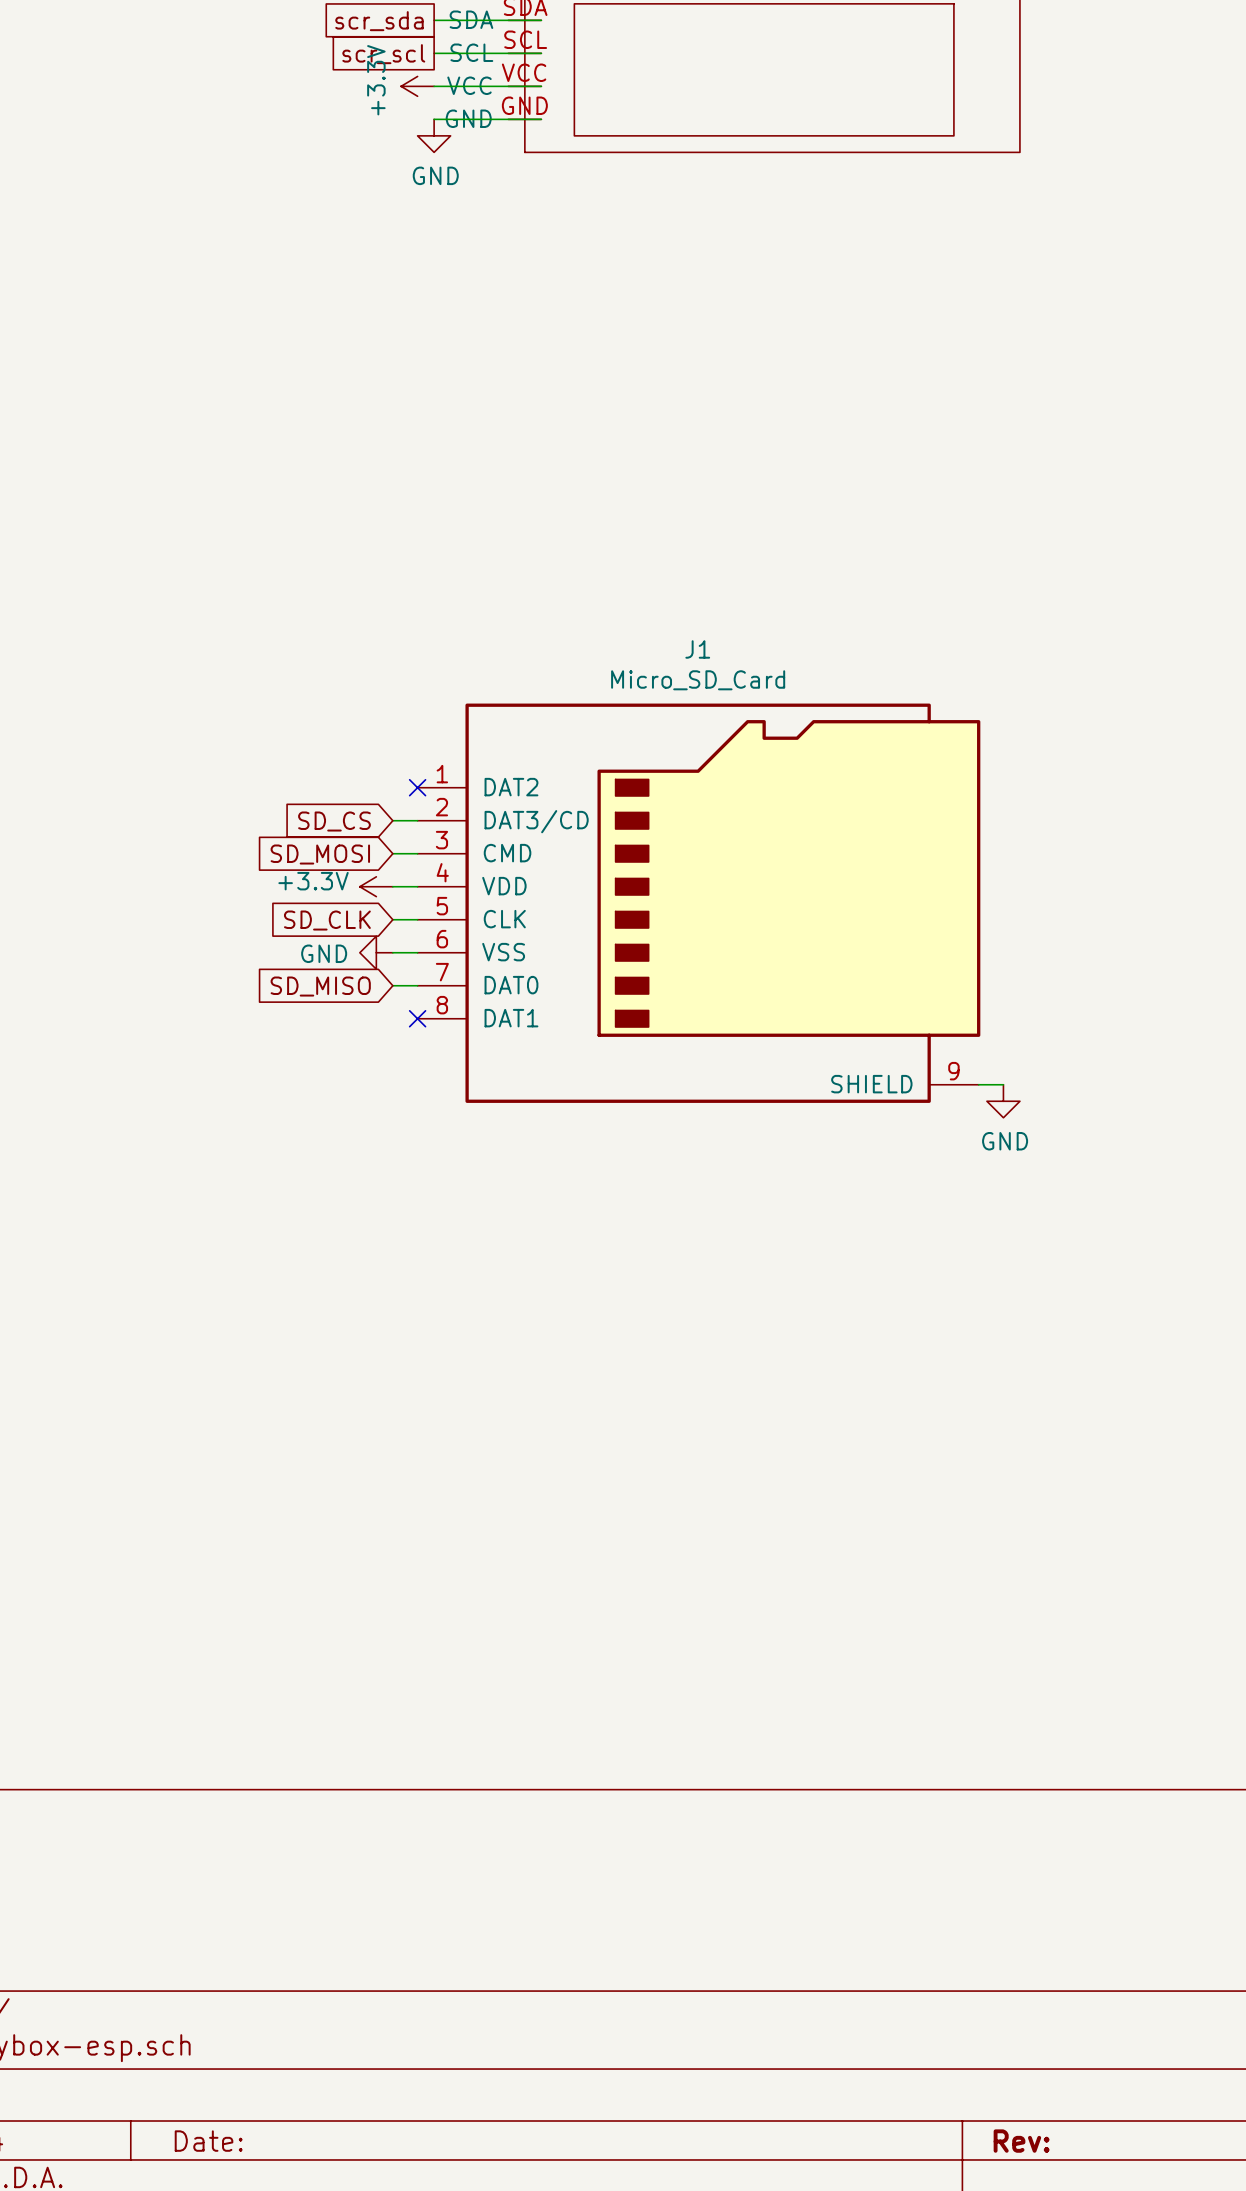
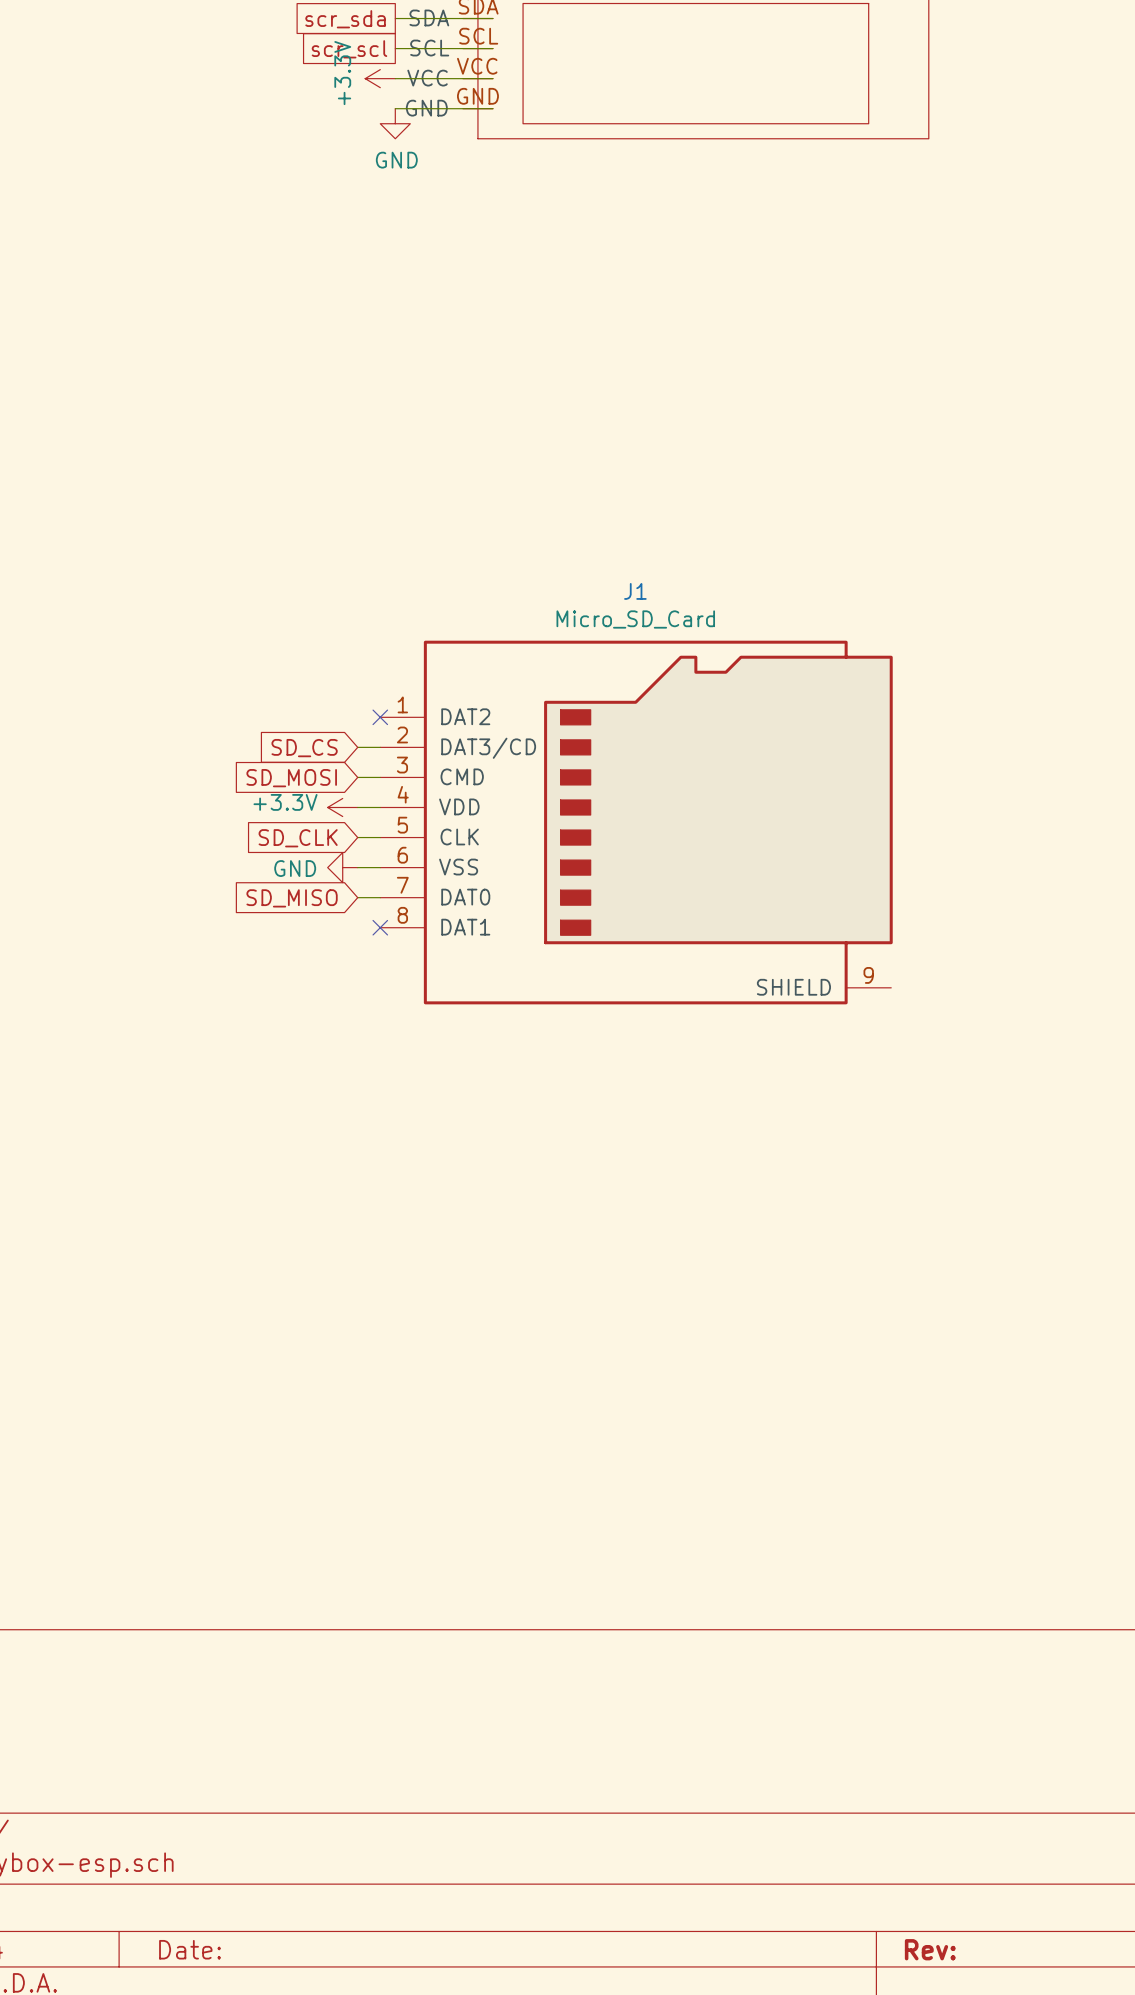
wire: (978, 1084) (1003, 1084) -> none
power symbol: GND (1003, 1101) -> none

